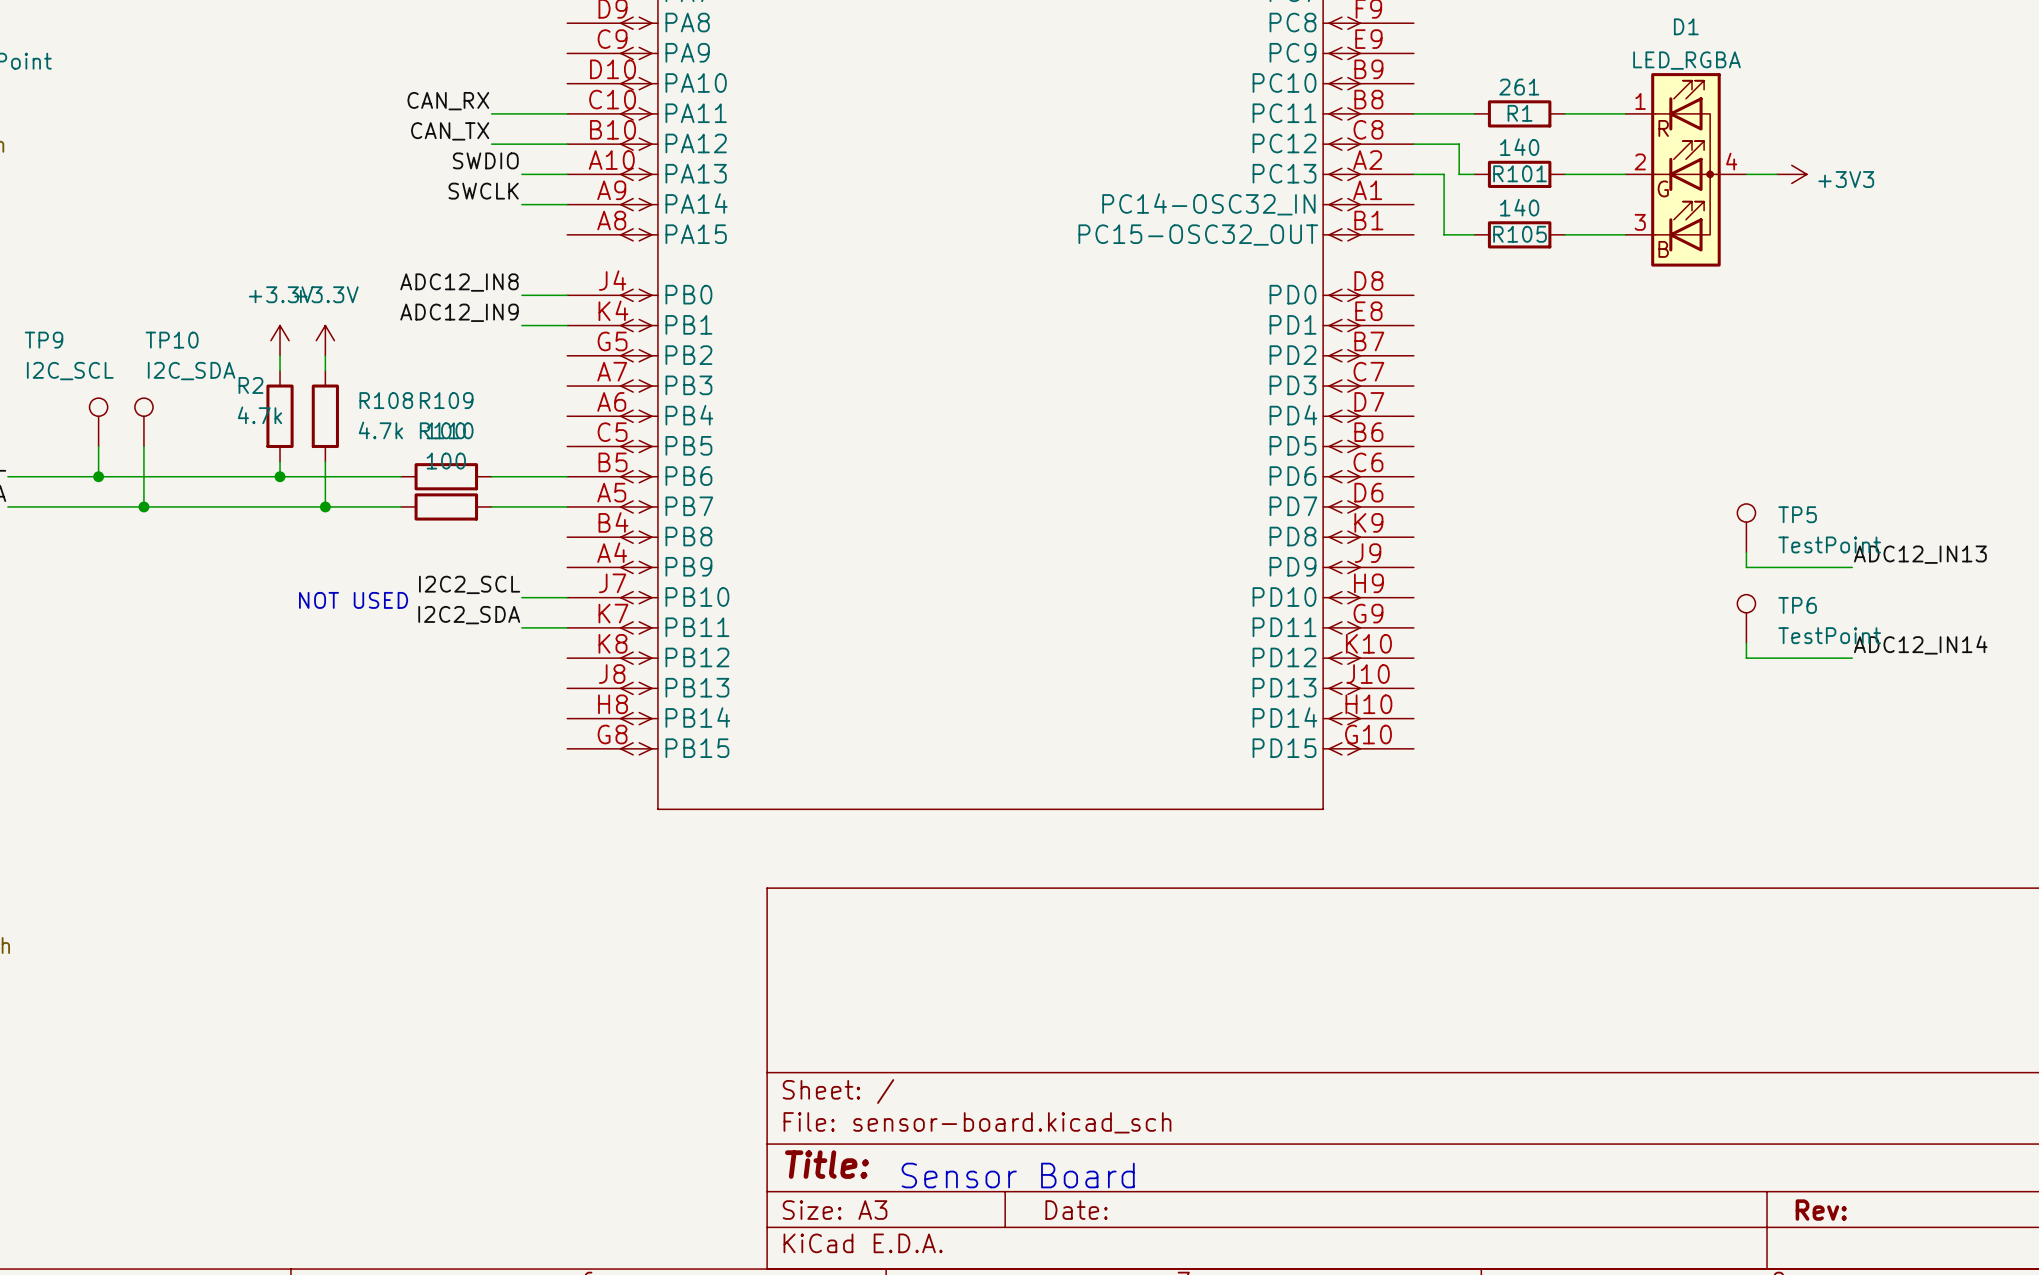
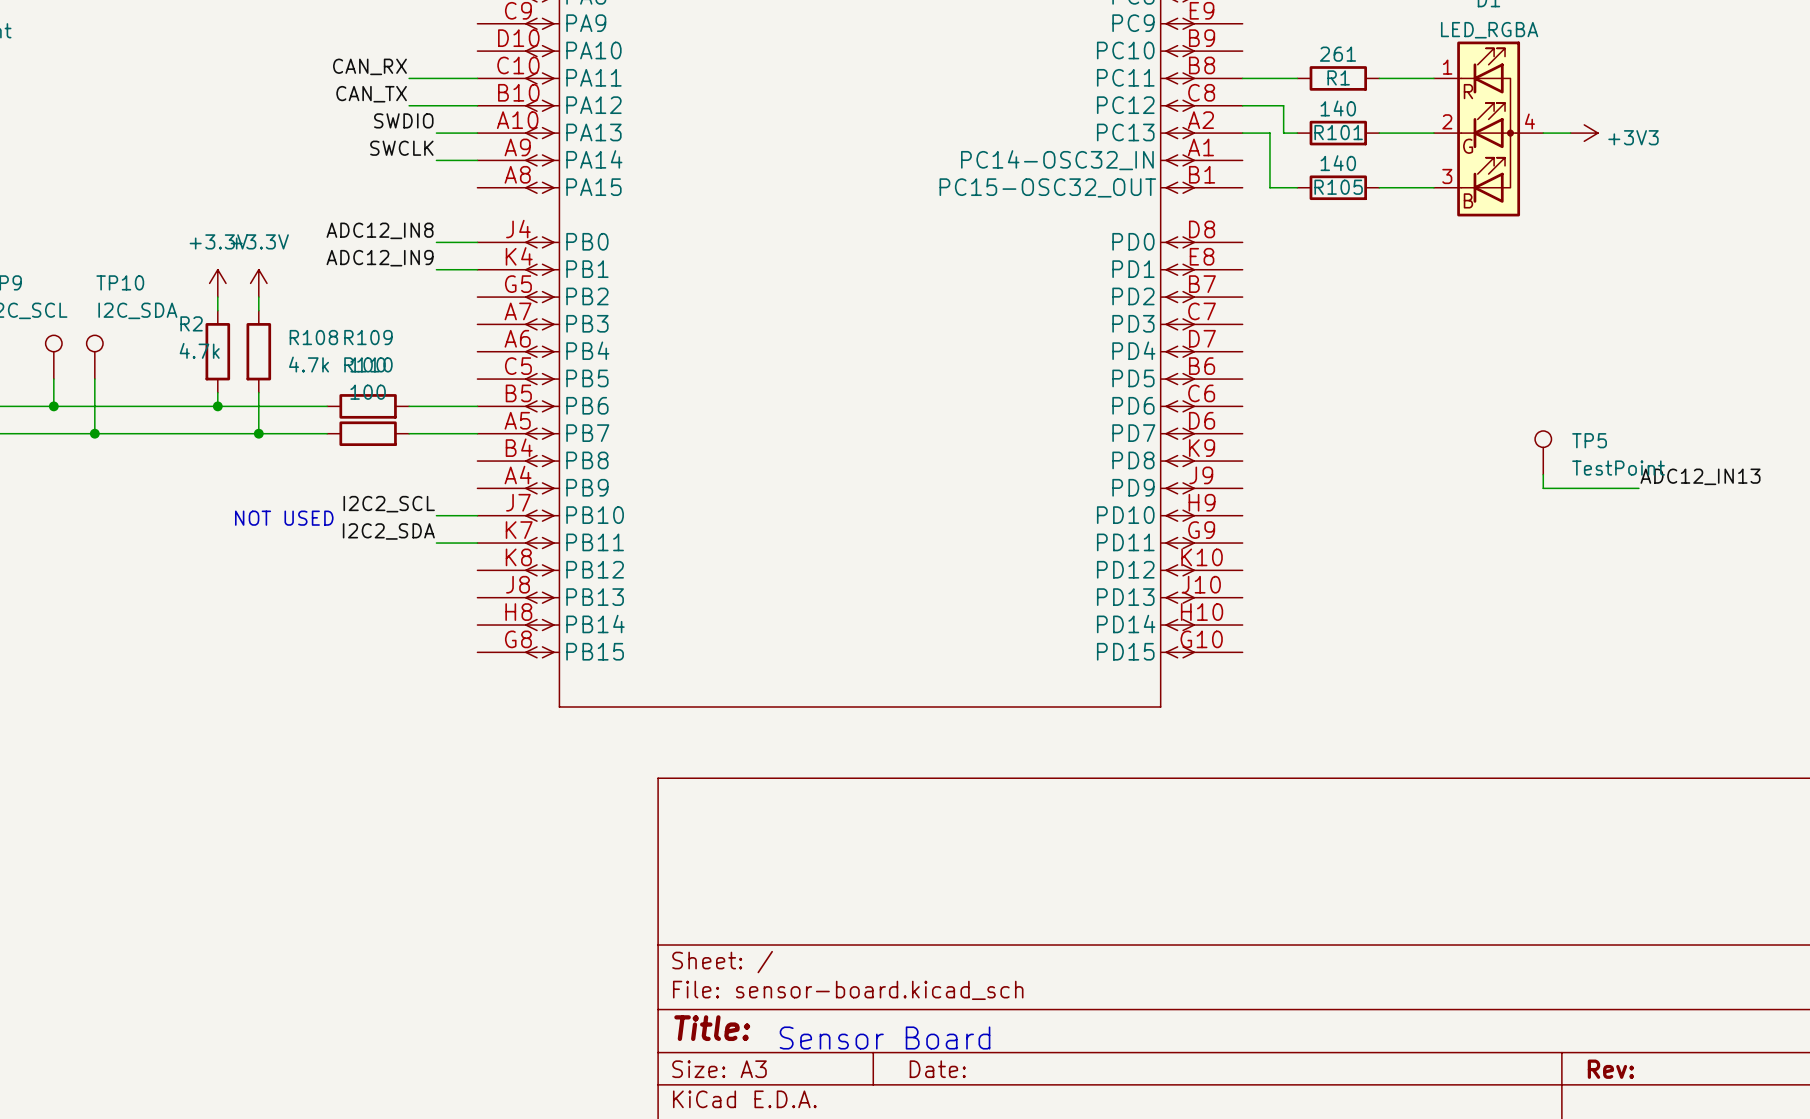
TP6: TestPoint (1746, 618) -> none
wire: (1746, 643) (1746, 658) (1852, 658) -> none
label: ADC12_IN14 (1920, 645) -> none

